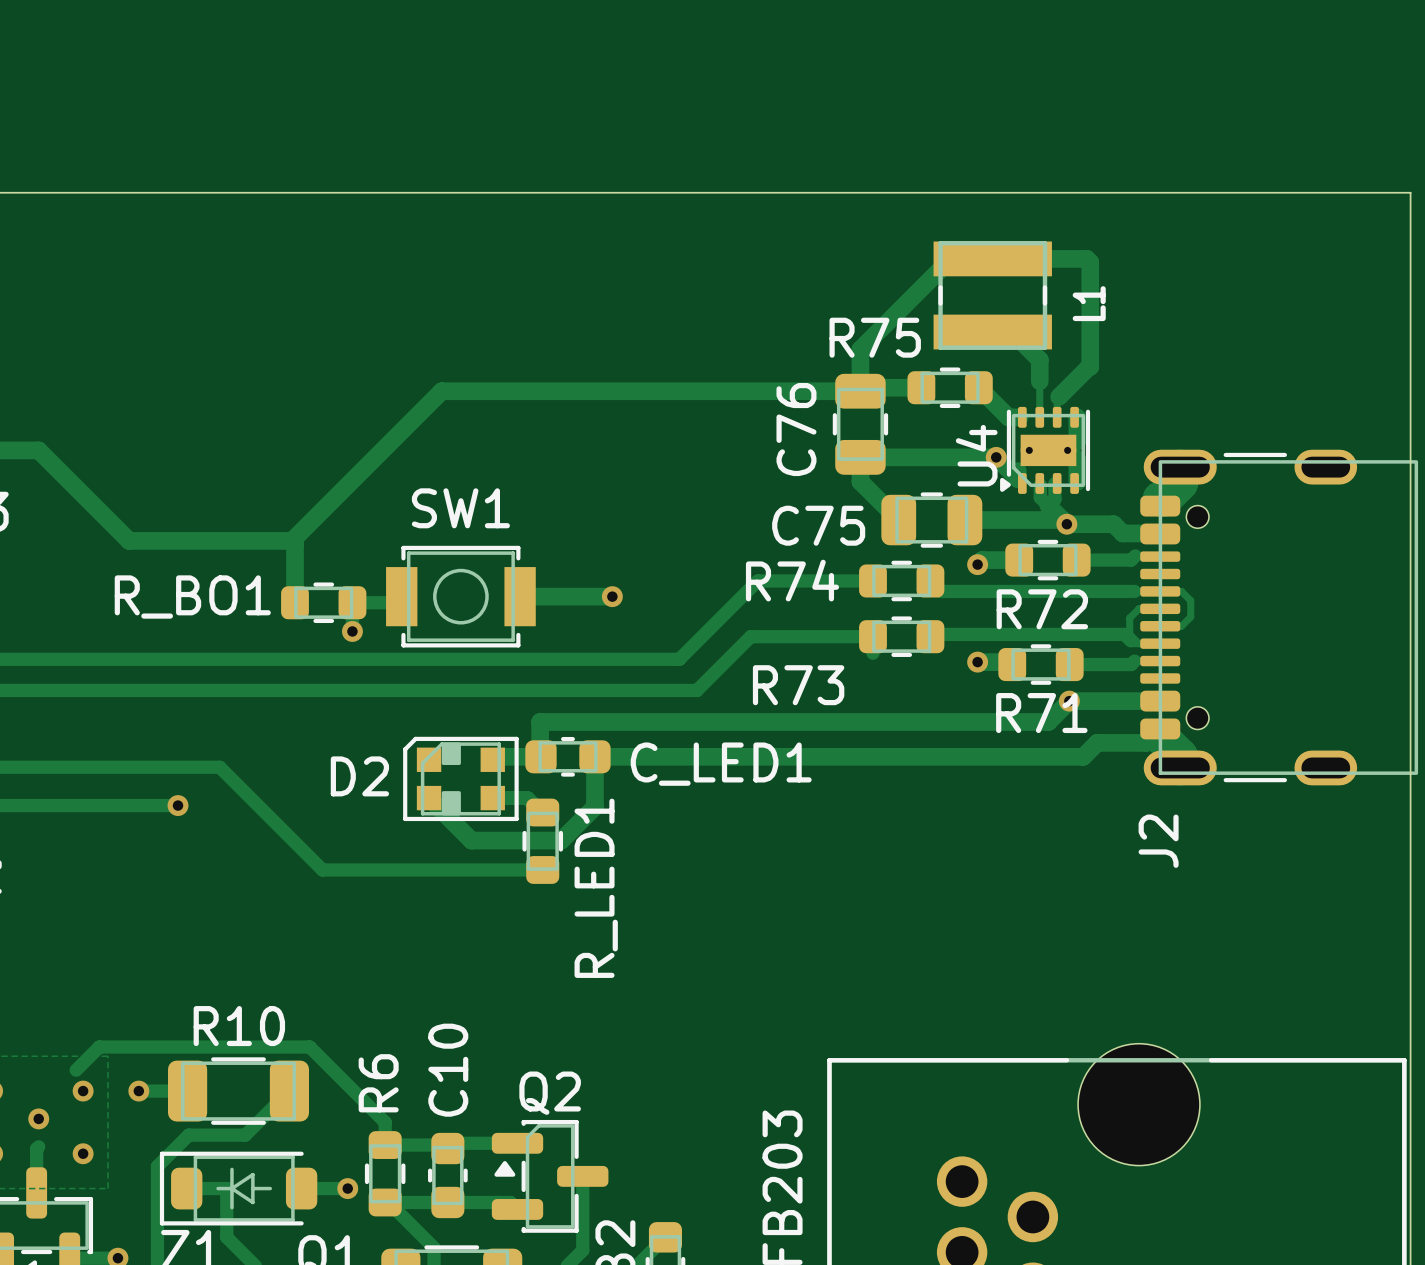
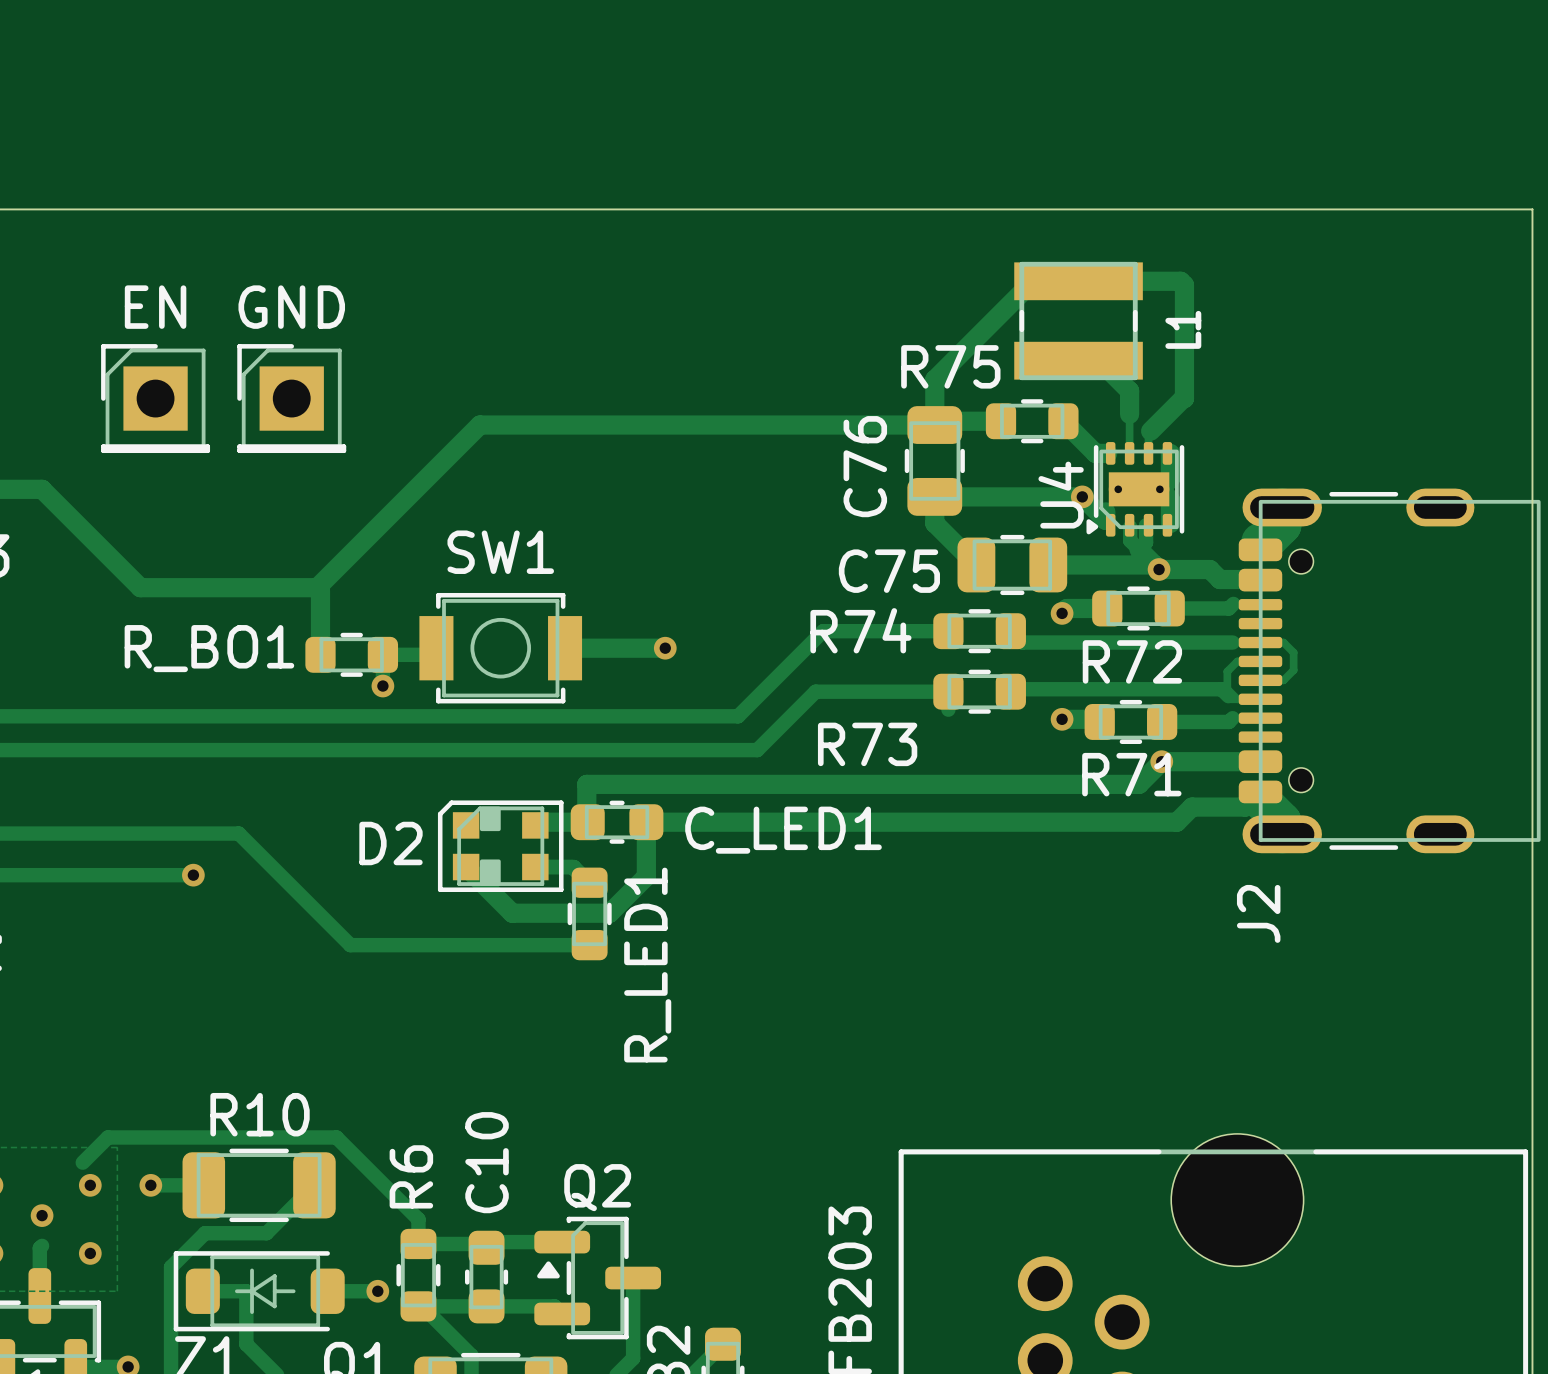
EN: none -> (155, 398)
GND: none -> (291, 398)

